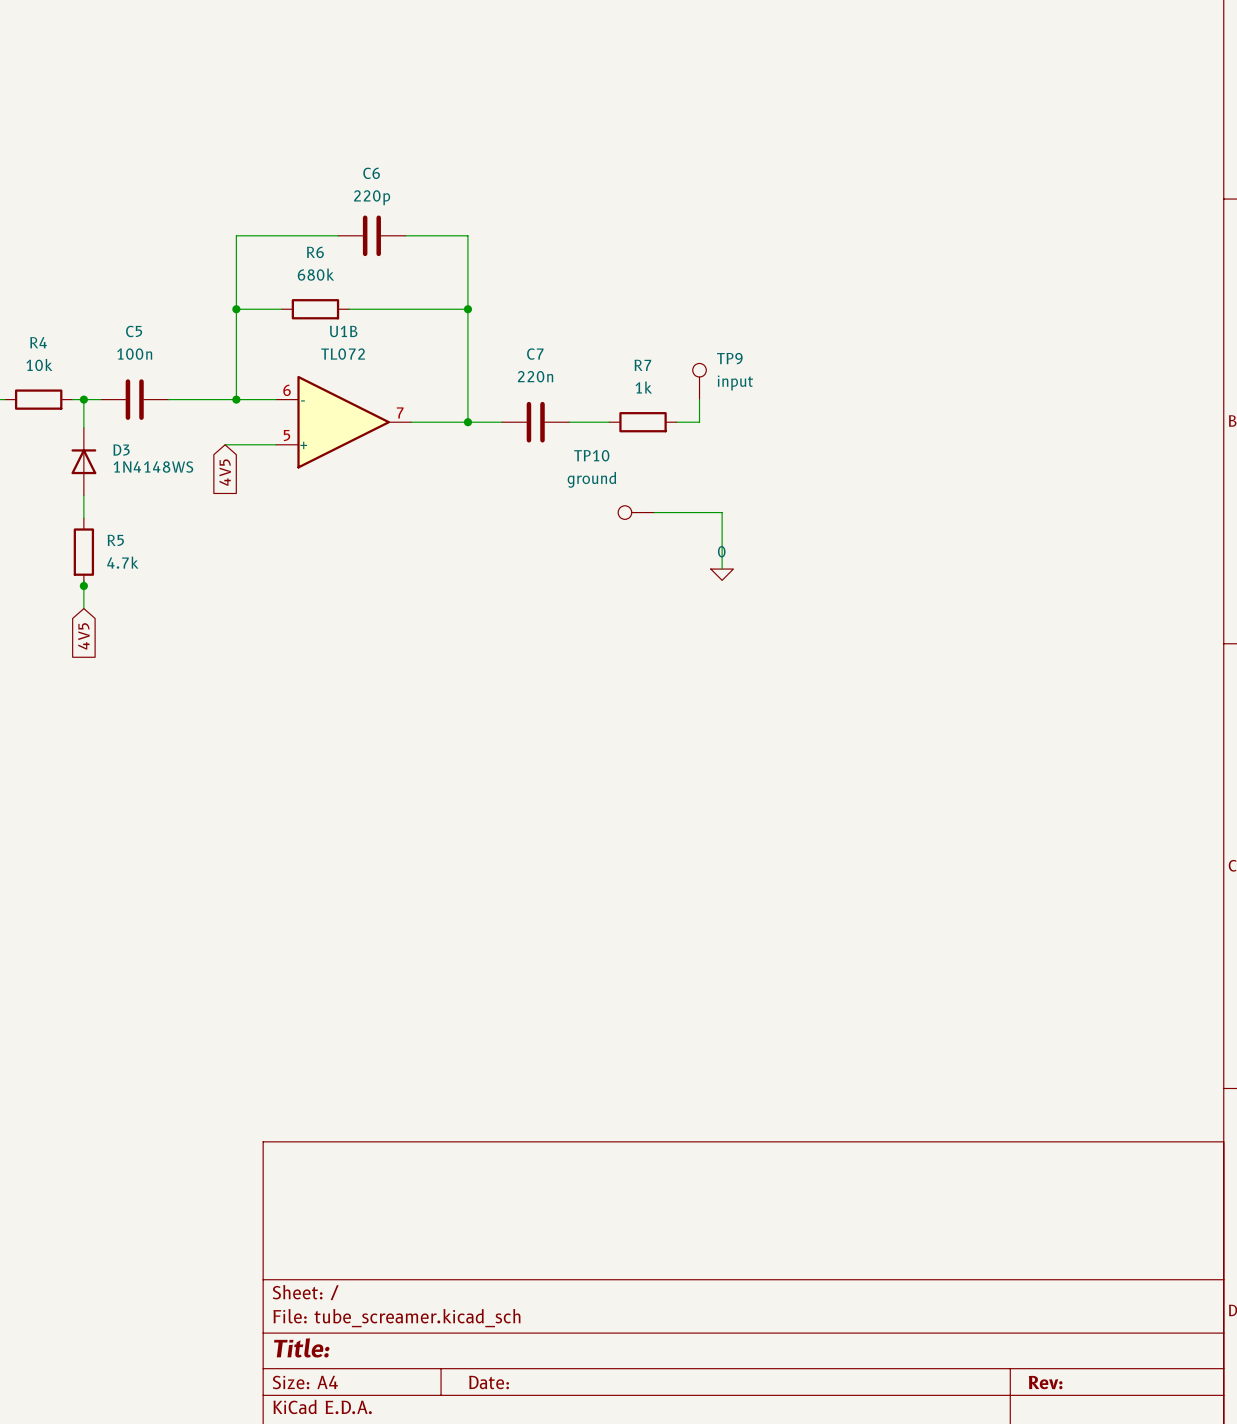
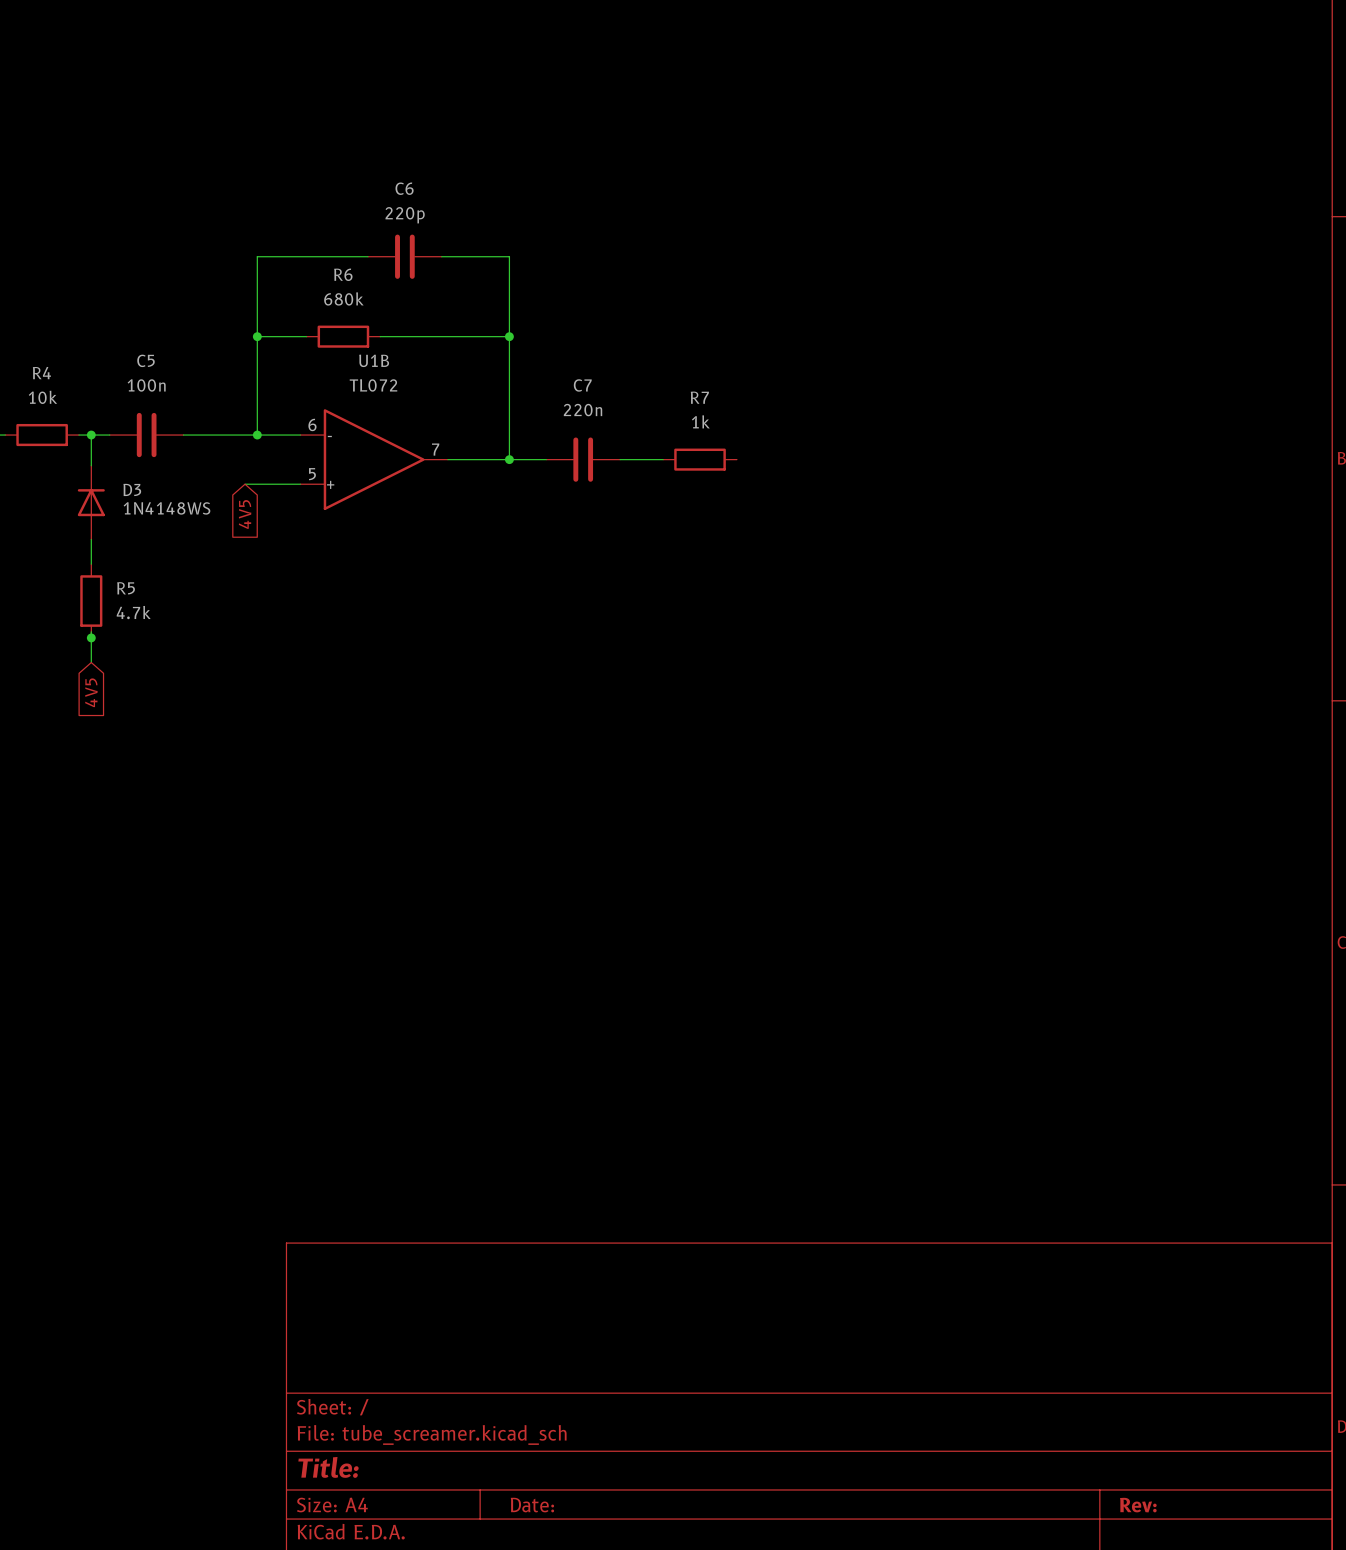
TP9: input (699, 381) -> none
wire: (699, 399) (699, 422) (676, 422) -> none
TP10: ground (636, 512) -> none
wire: (654, 512) (722, 512) (722, 569) -> none
power symbol: 0 (722, 574) -> none

